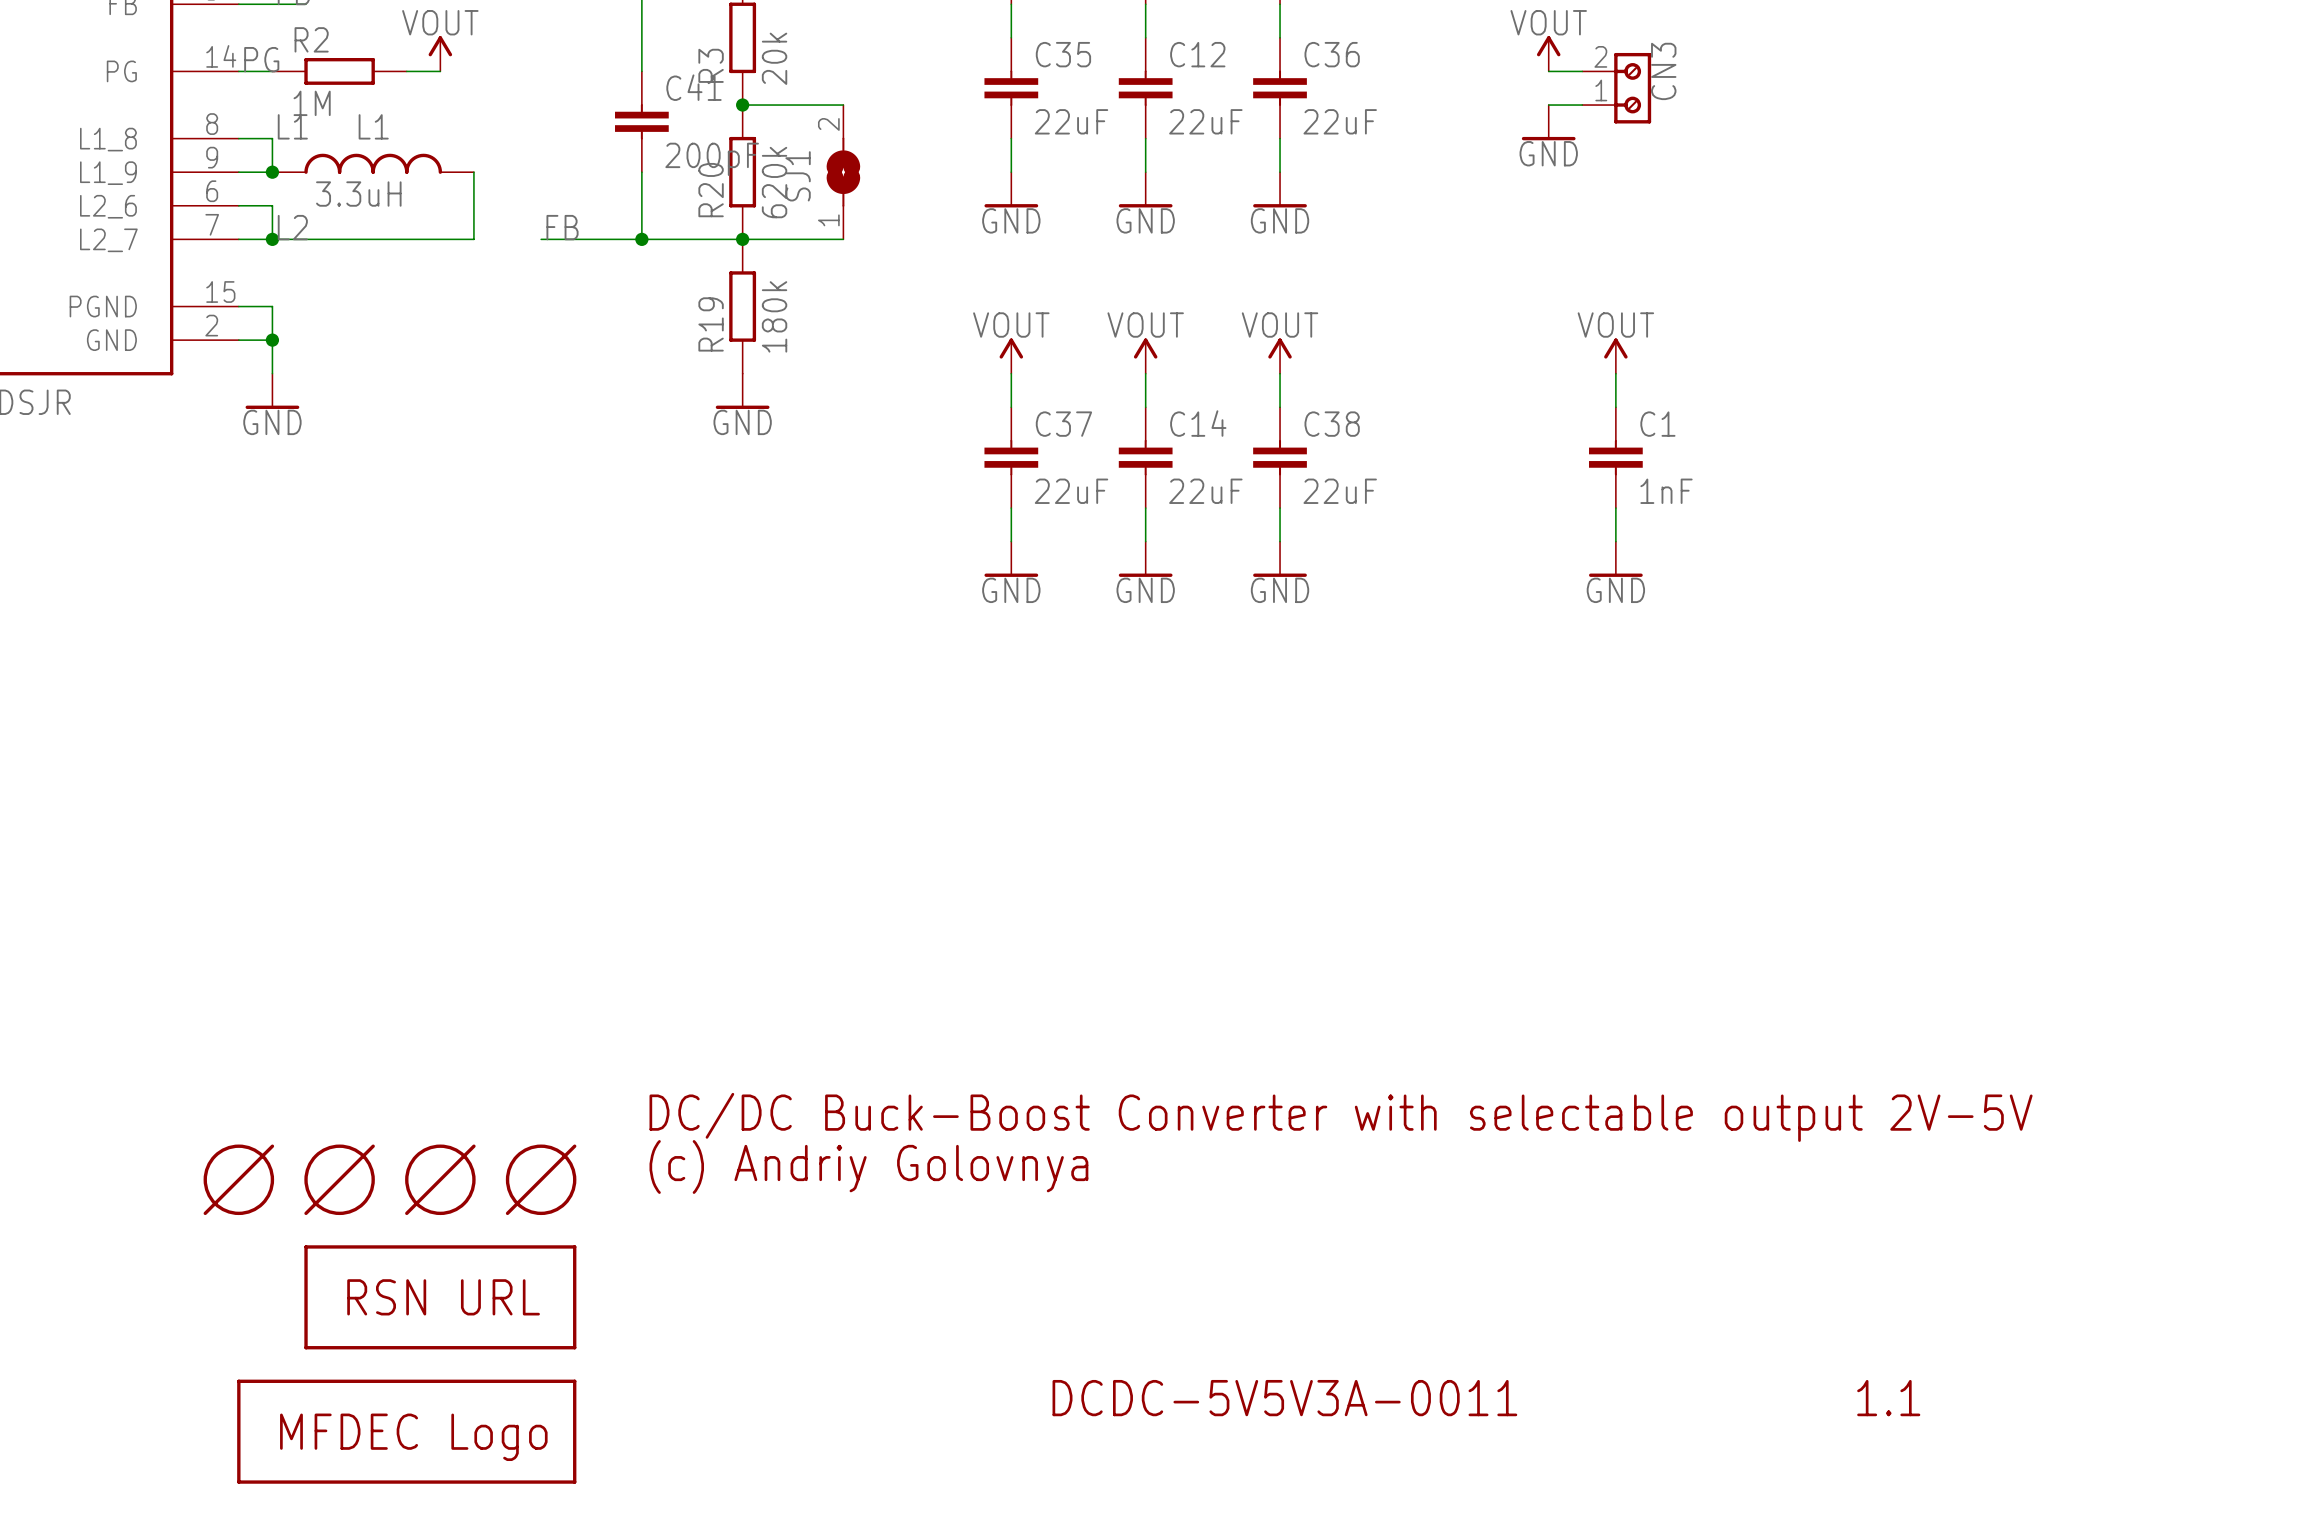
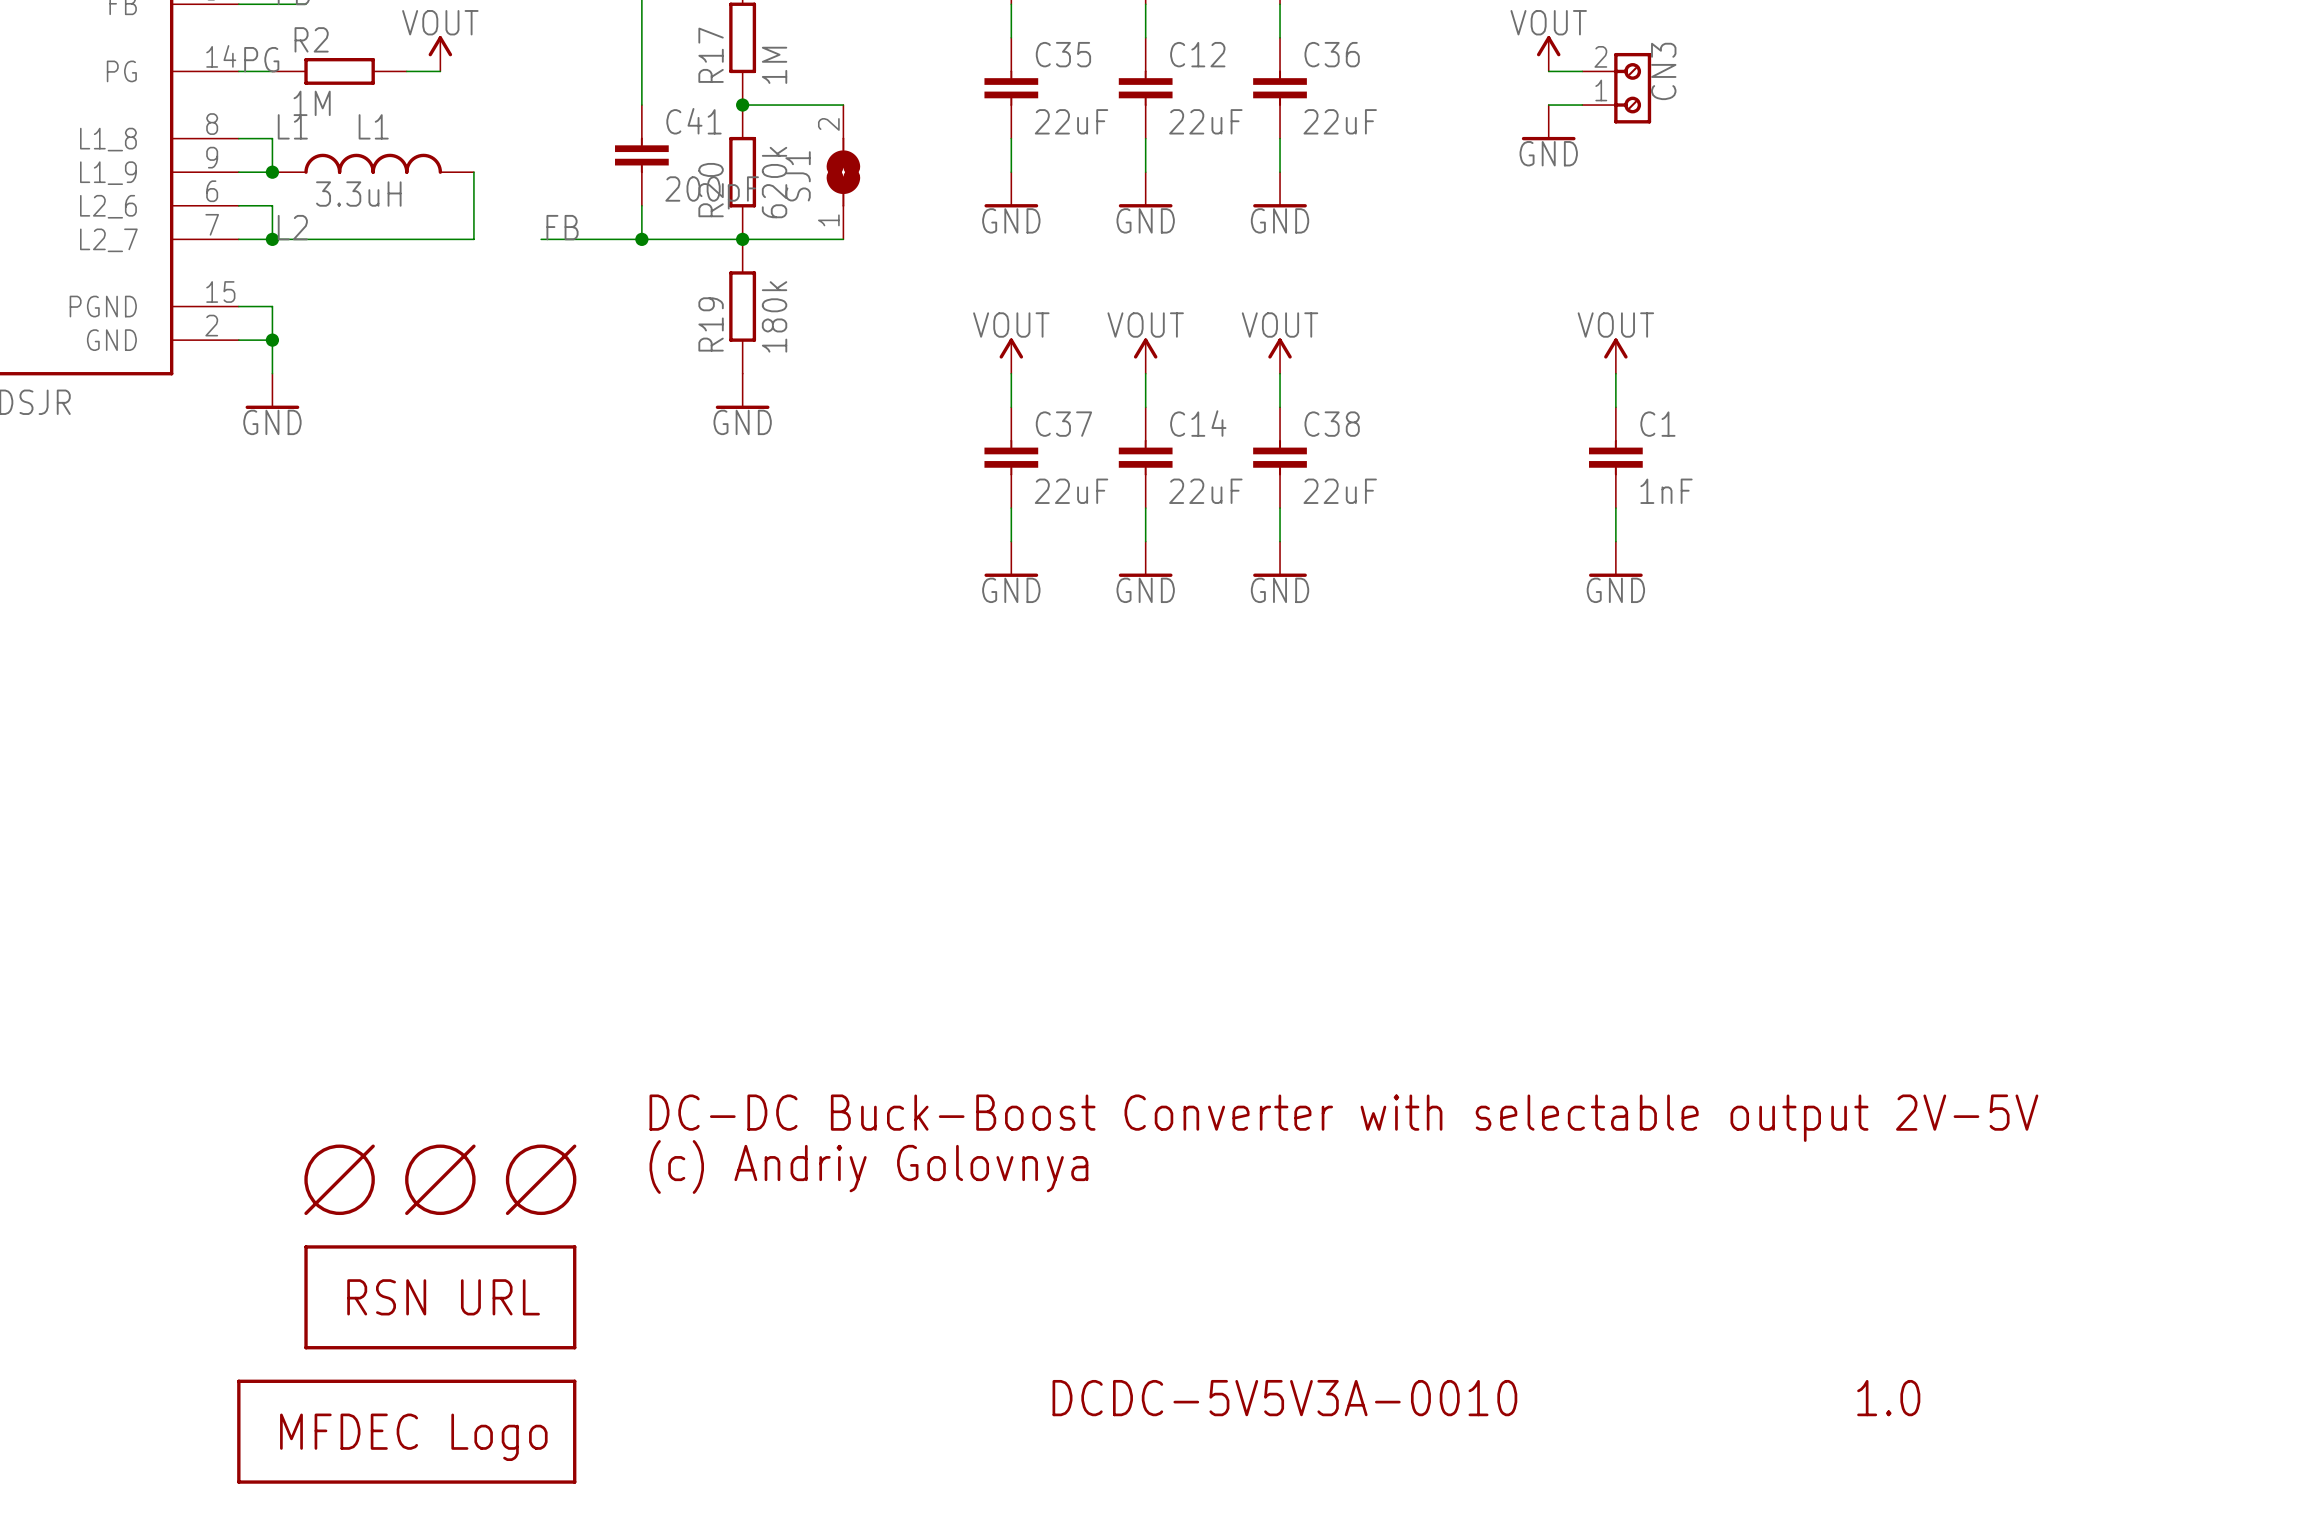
R3 value: 20k (774, 58) -> 1M (774, 65)
R3 name: R3 (711, 65) -> R17 (711, 55)
C41 position: (641, 121) -> (641, 155)
text: DC/DC Buck-Boost Converter with selectable output 2V-5V (1341, 1117) -> DC-DC Buck-Boost Converter with selectable output 2V-5V (1343, 1118)
part: (238, 1179) -> none
text: DCDC-5V5V3A-0011 (1284, 1398) -> DCDC-5V5V3A-0010 (1284, 1398)
text: 1.1 (1888, 1398) -> 1.0 (1888, 1398)

